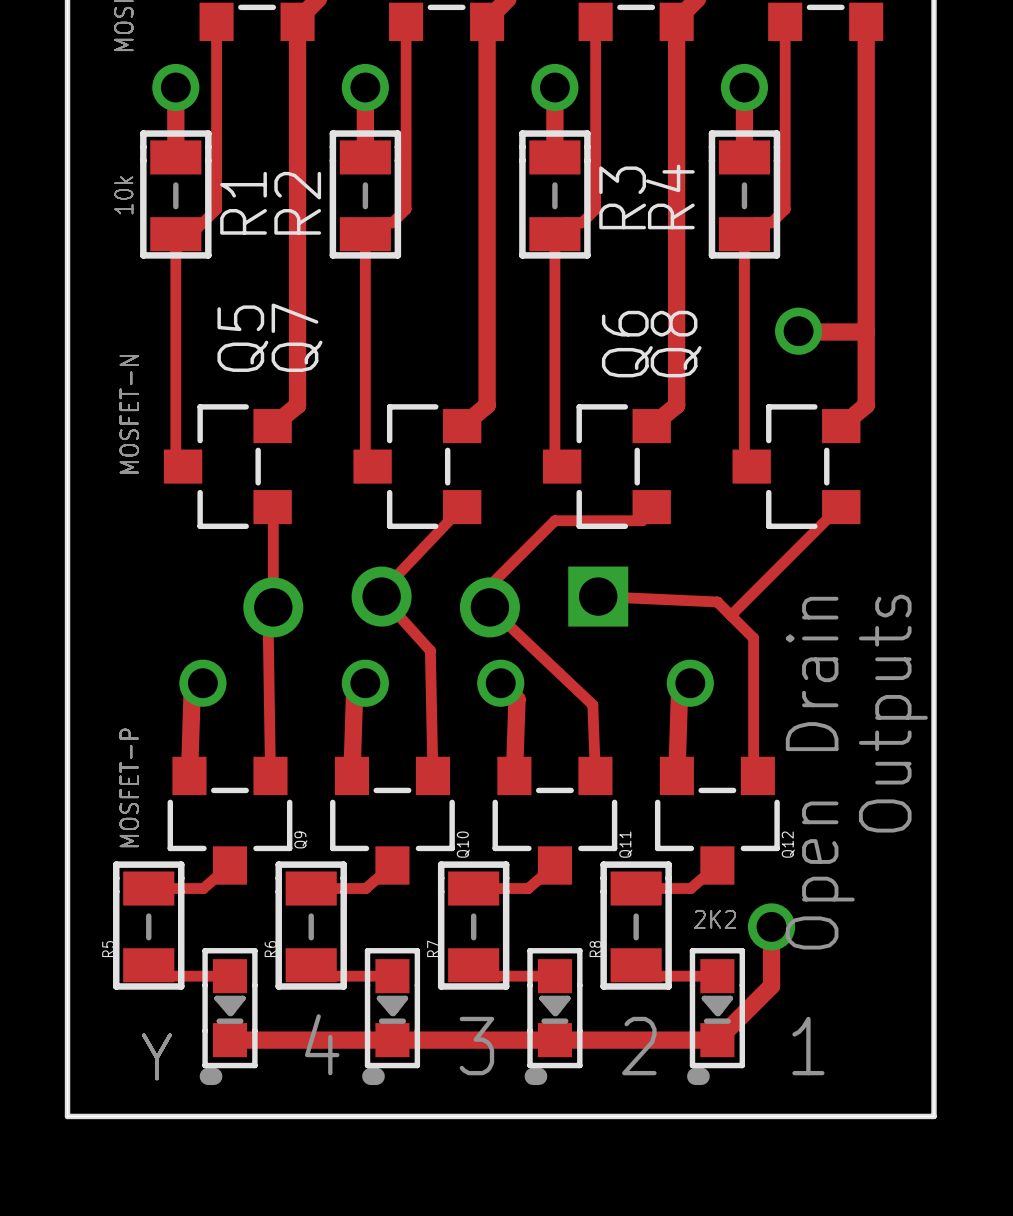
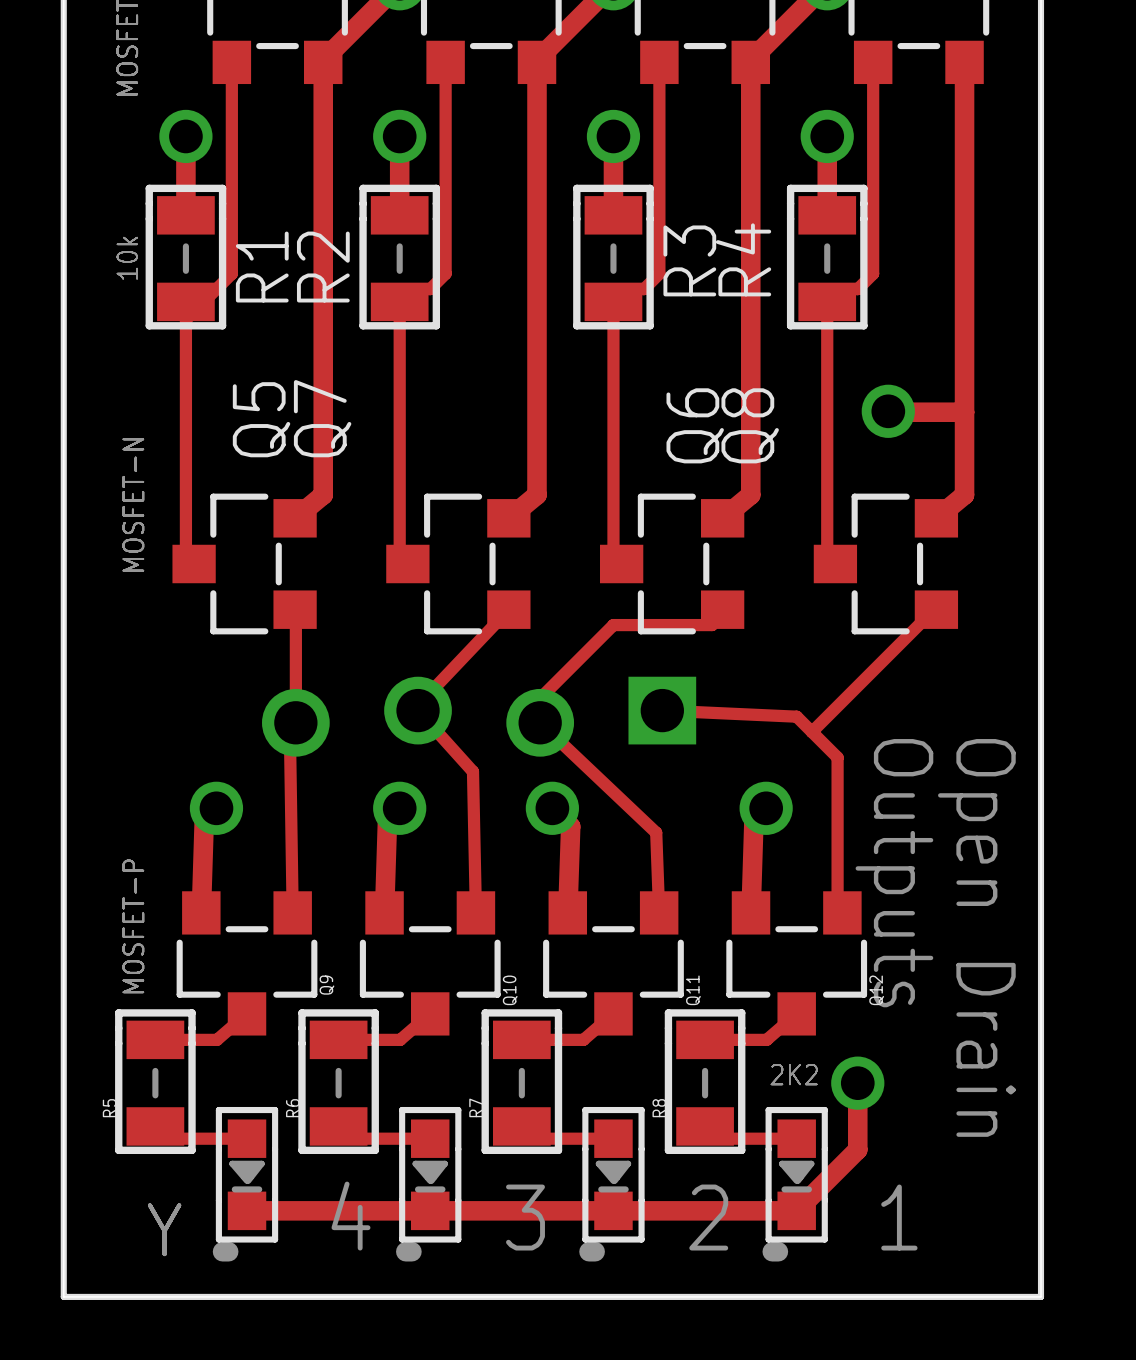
text rotation: 0° (893, 713) -> 180° (894, 873)
text rotation: 0° (820, 773) -> 180° (976, 937)

